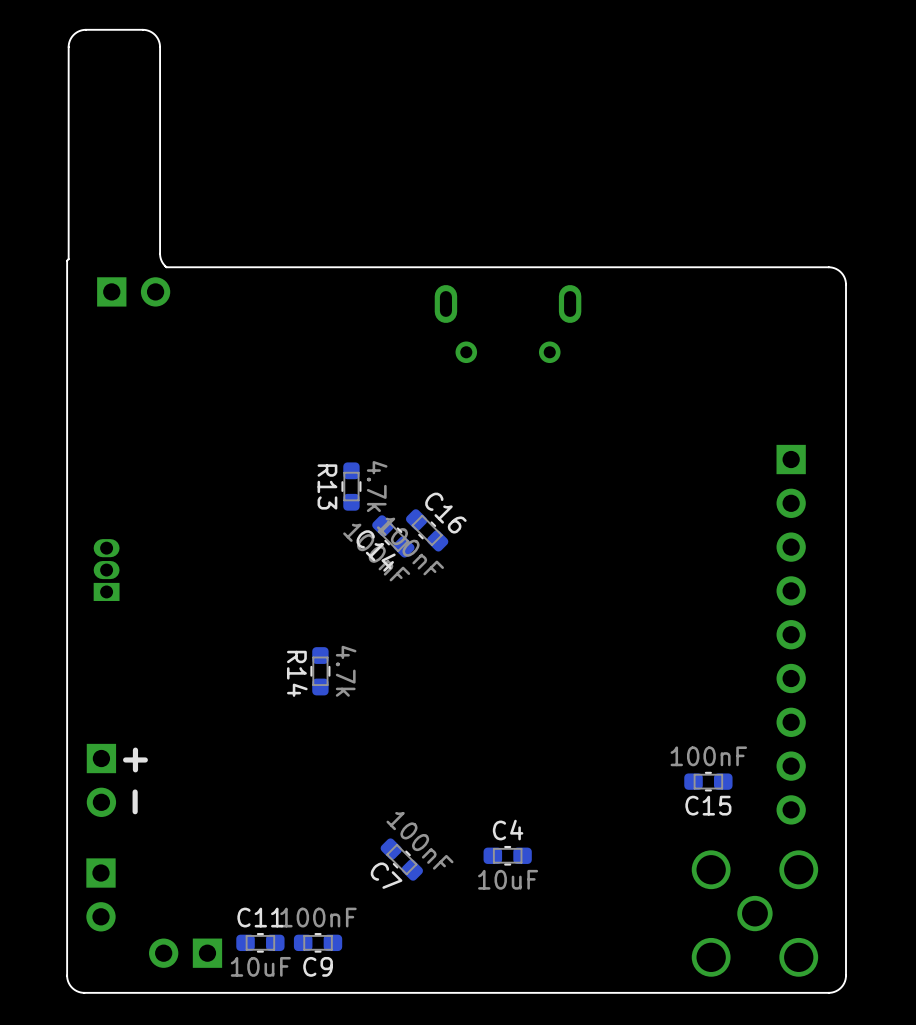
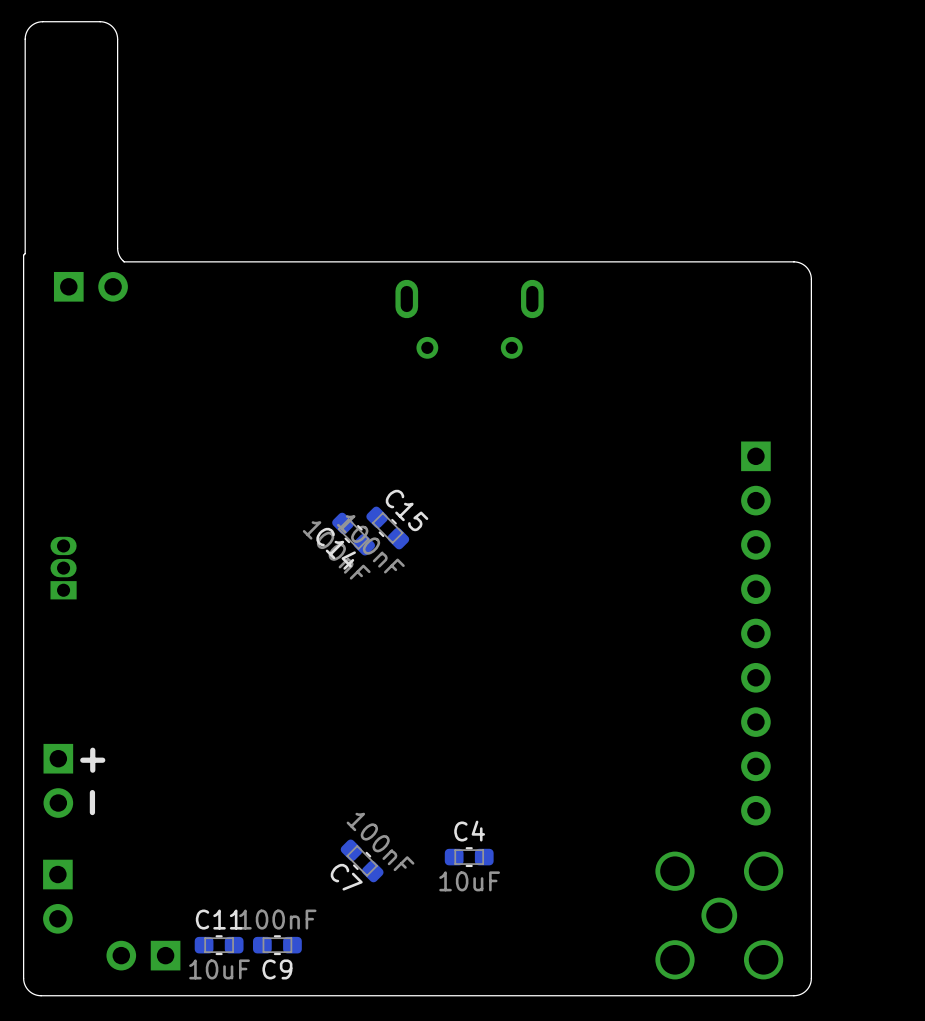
R13: 4.7k (351, 486) -> none
C16 name: C16 (445, 513) -> C15 (407, 510)
R14: 4.7k (320, 671) -> none
C15: 100nF (708, 781) -> none

